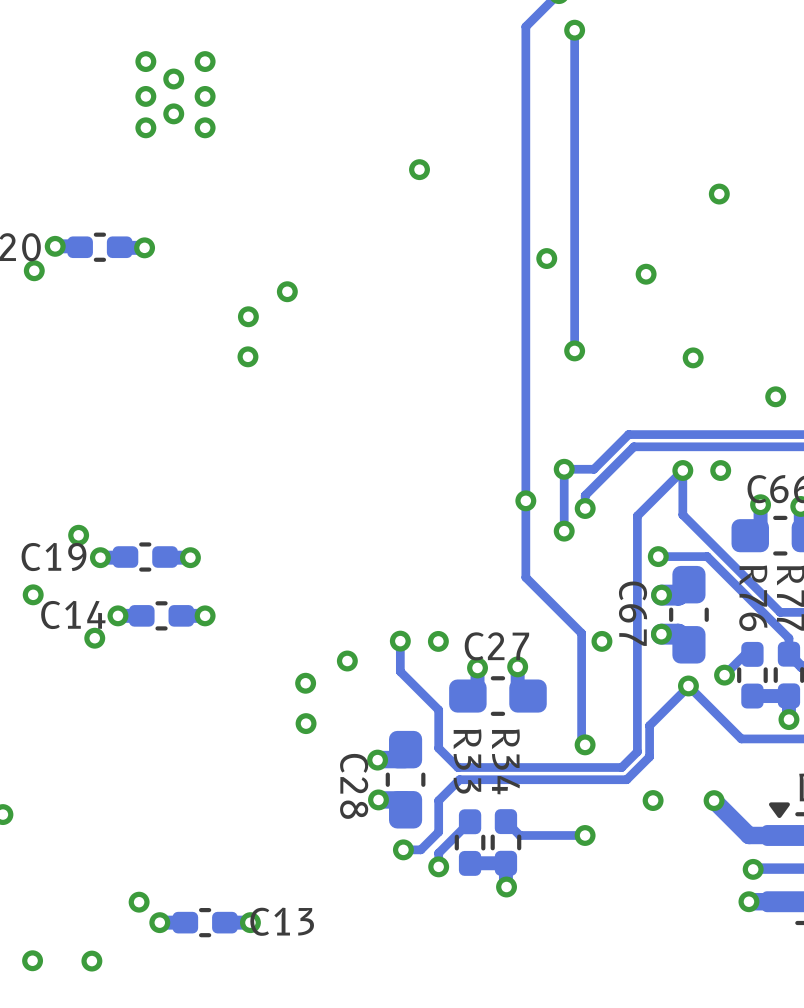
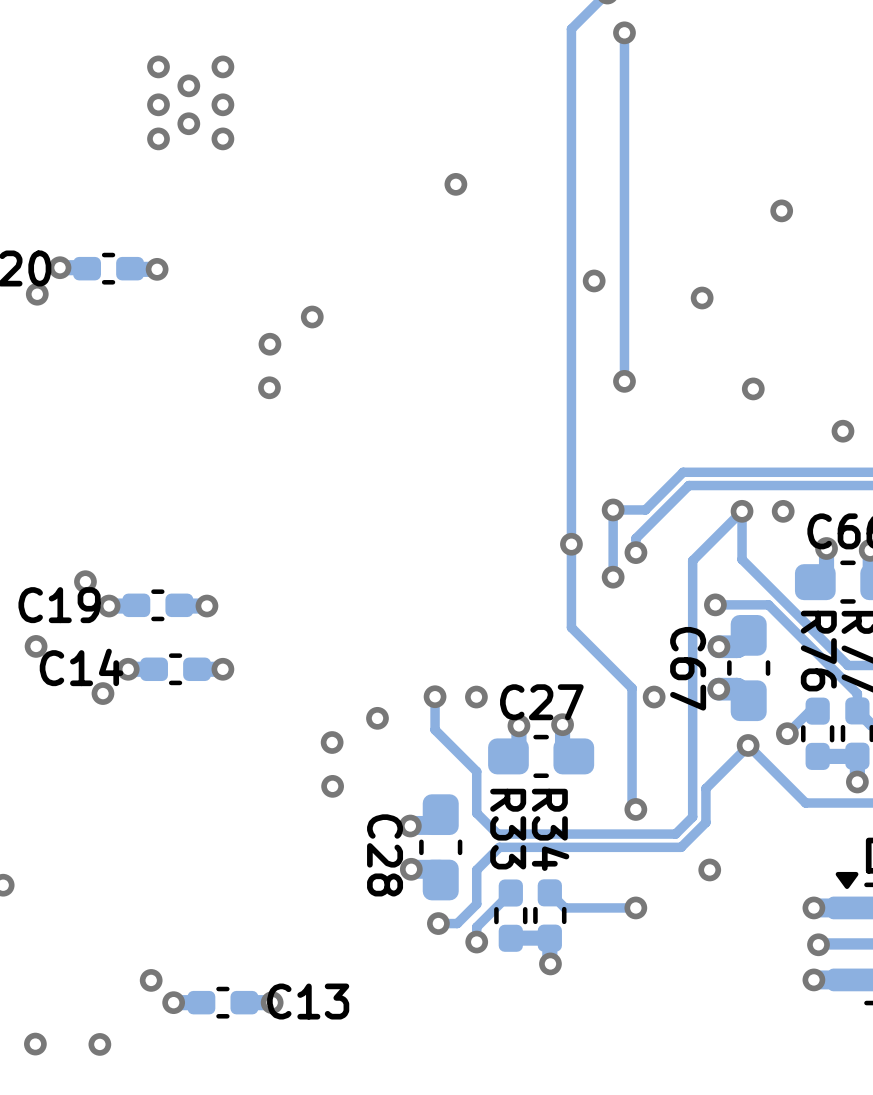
track: (714, 800) (748, 835) -> none
via position: (714, 800) -> (813, 907)

